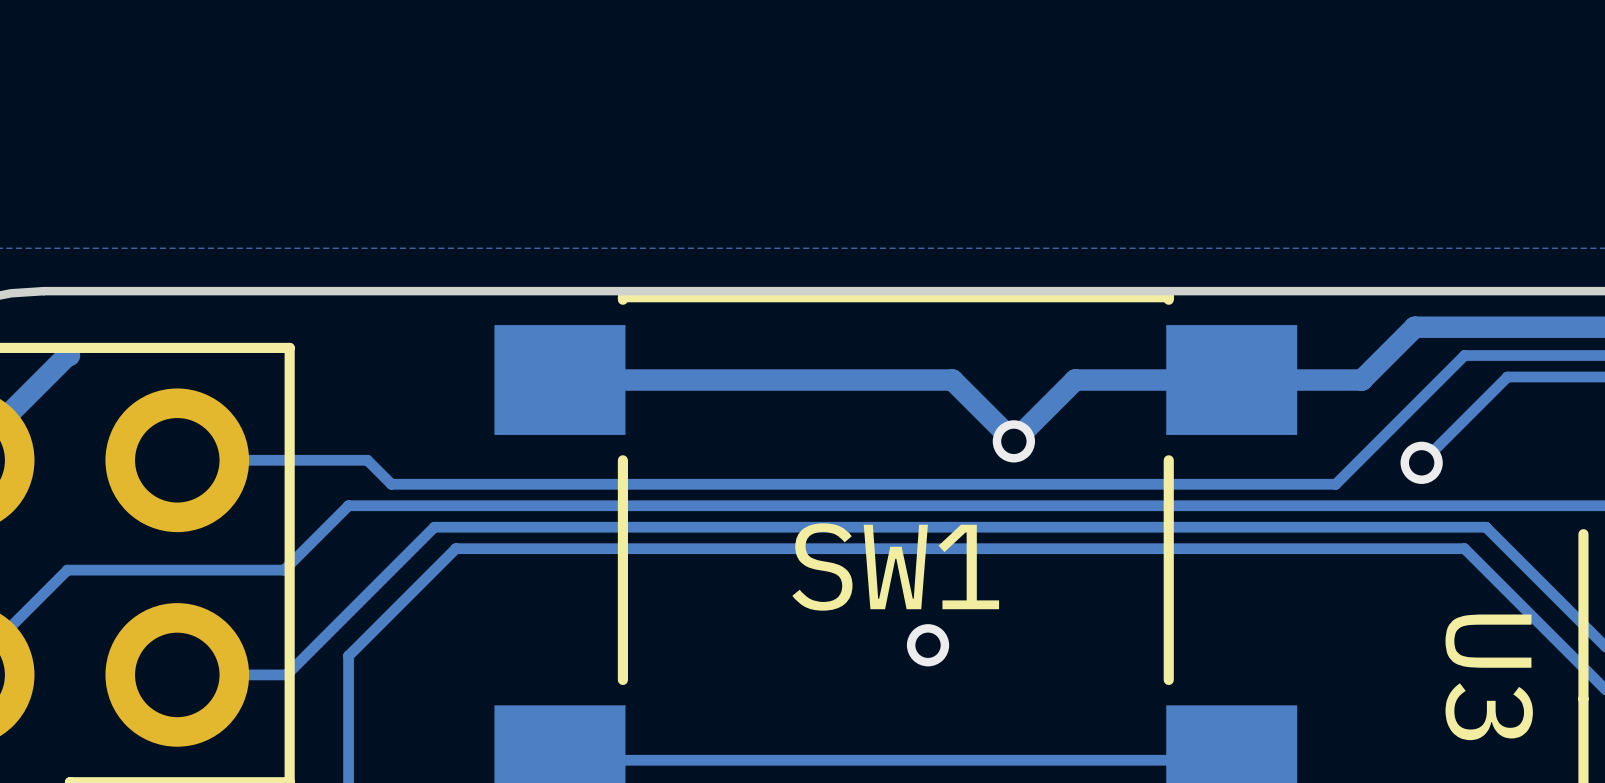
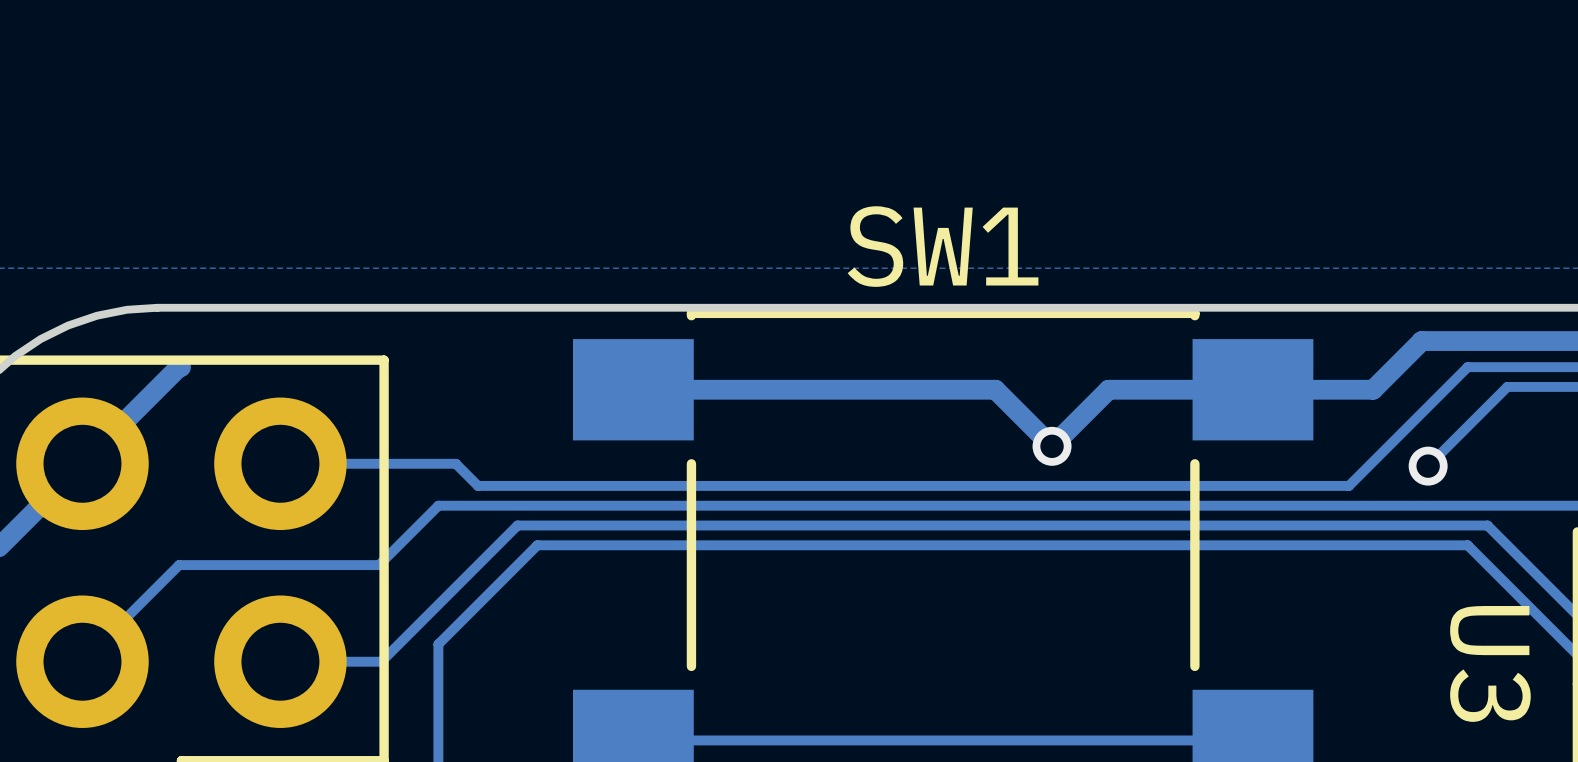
SW1 name position: SW1 (895, 566) -> SW1 (943, 246)
via: (928, 645) -> none

